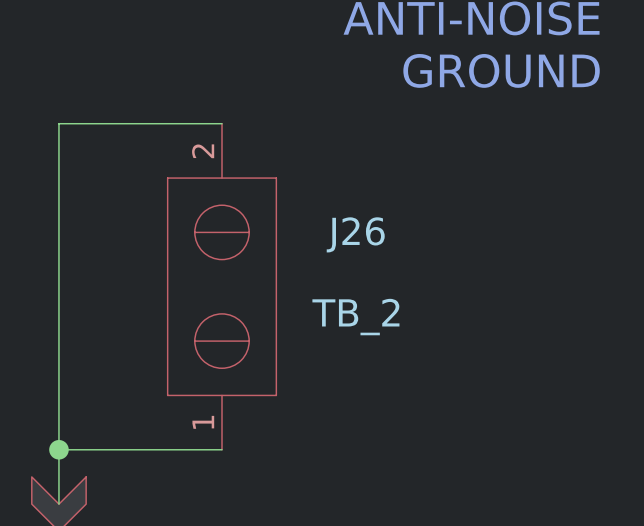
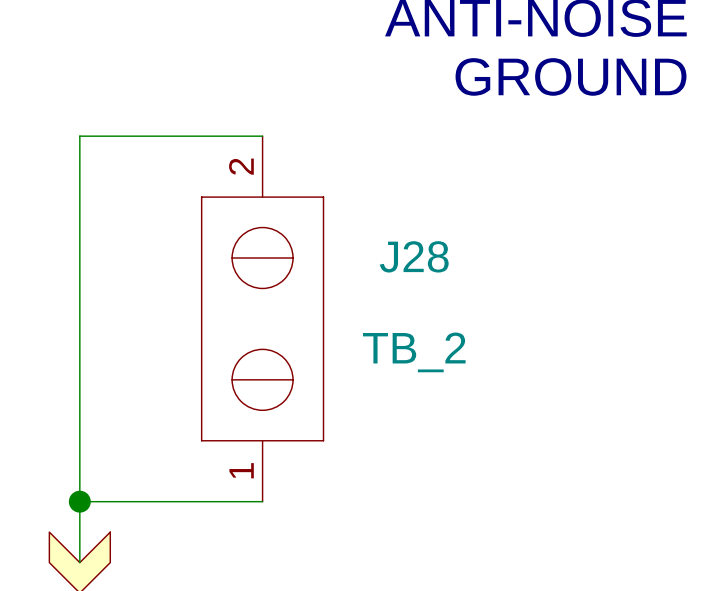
J26 name: J26 (355, 234) -> J28 (414, 256)

